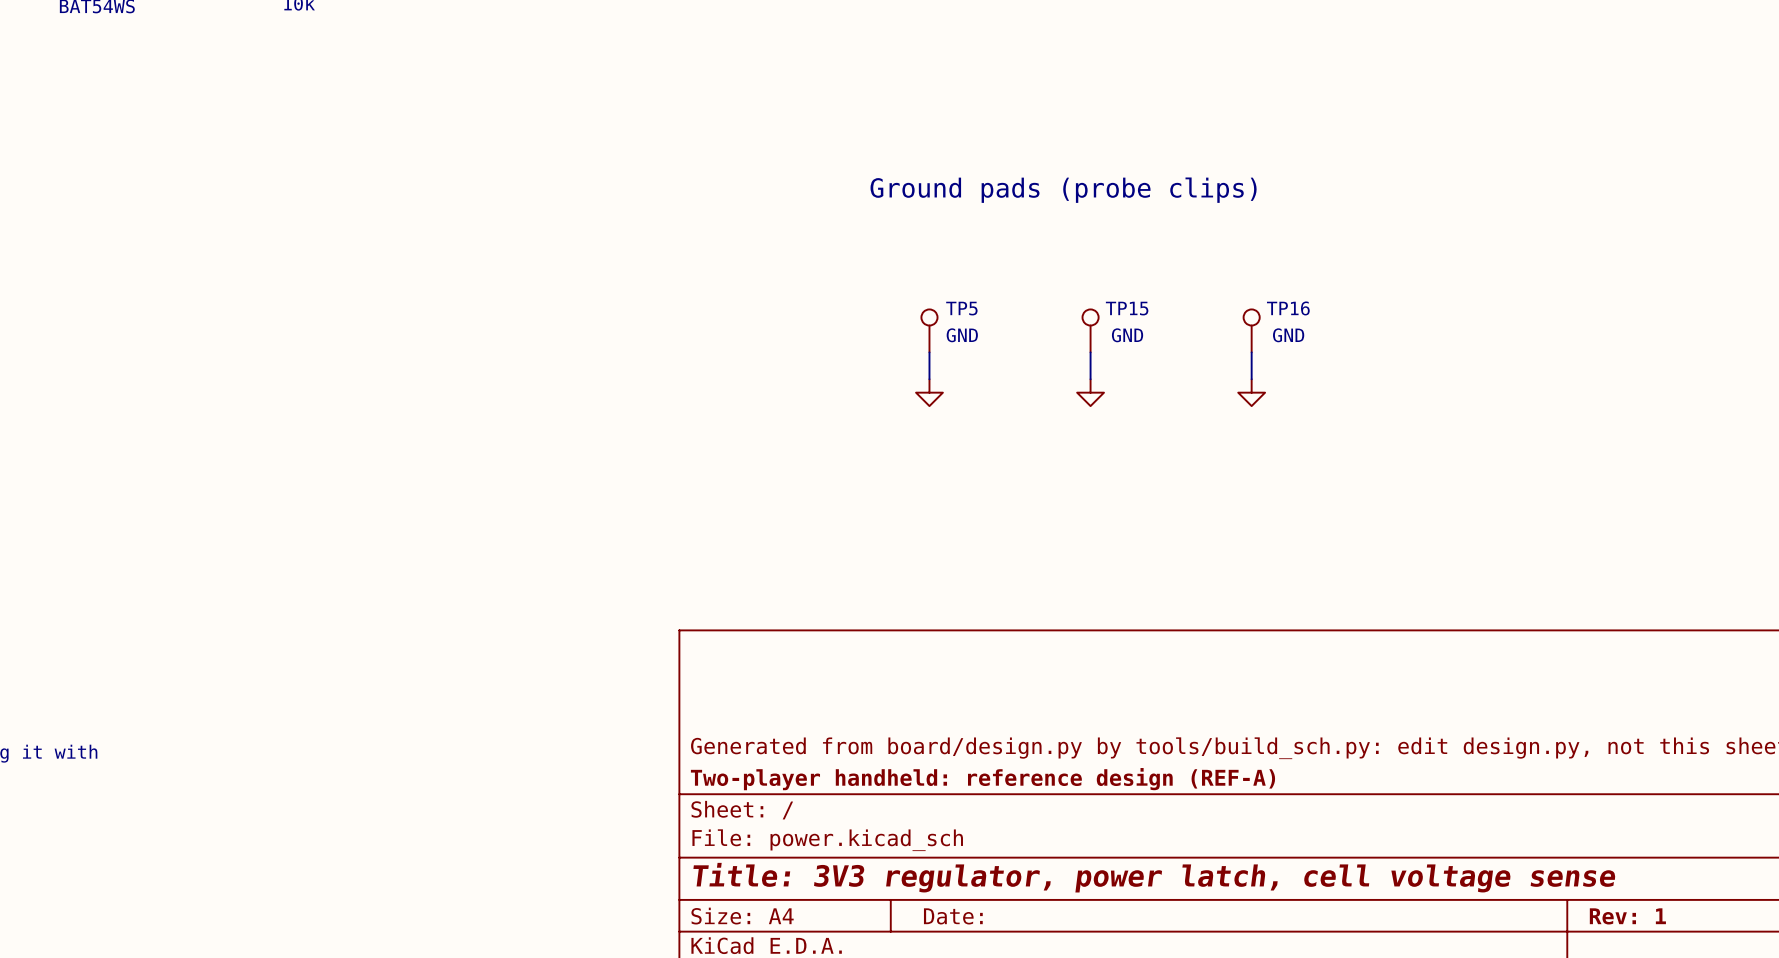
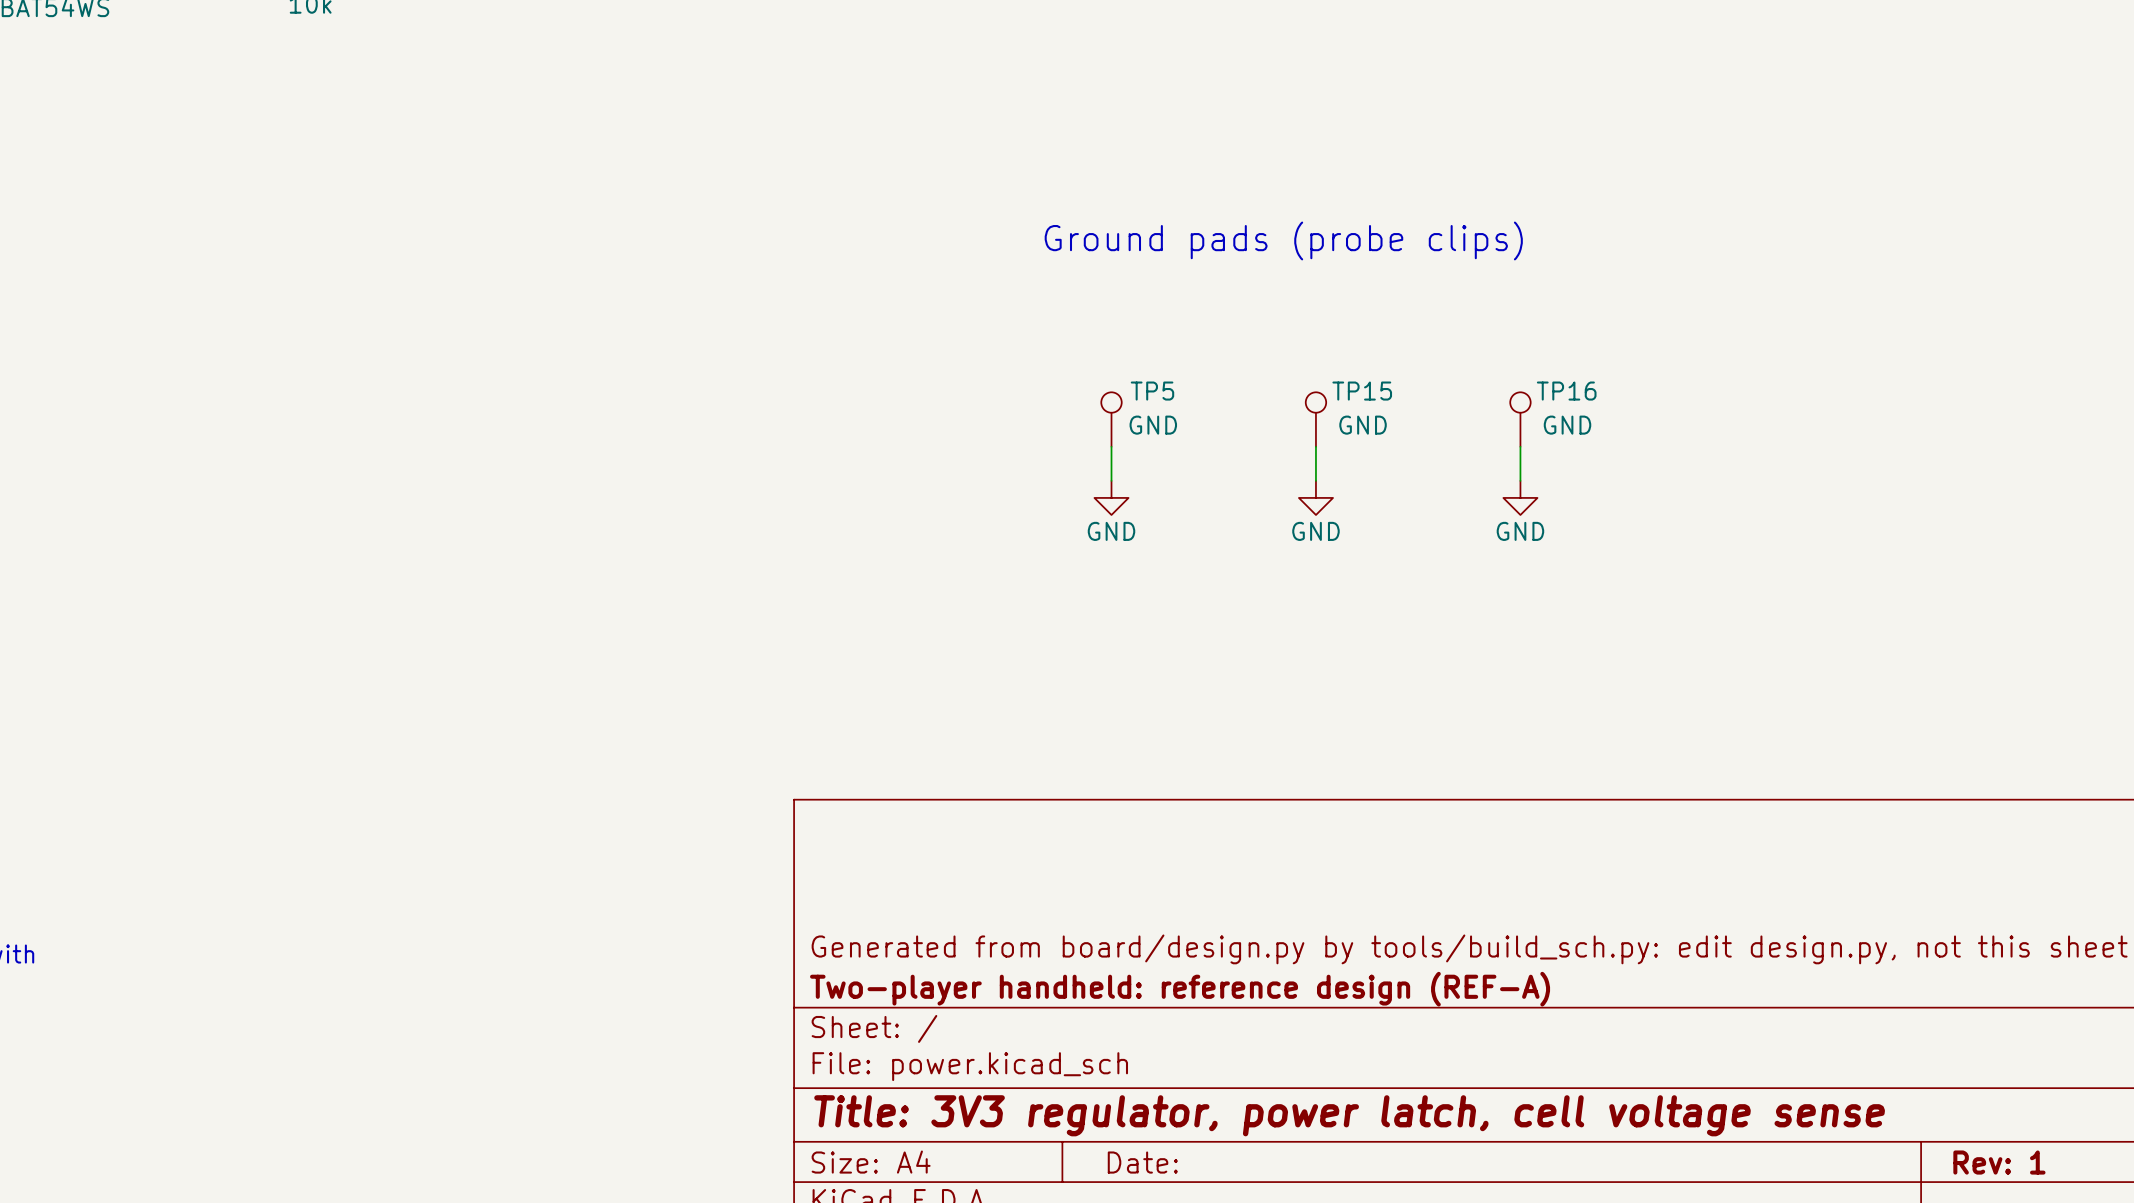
power symbol text: none -> GND (1111, 531)
power symbol text: none -> GND (1315, 531)
power symbol text: none -> GND (1520, 531)

